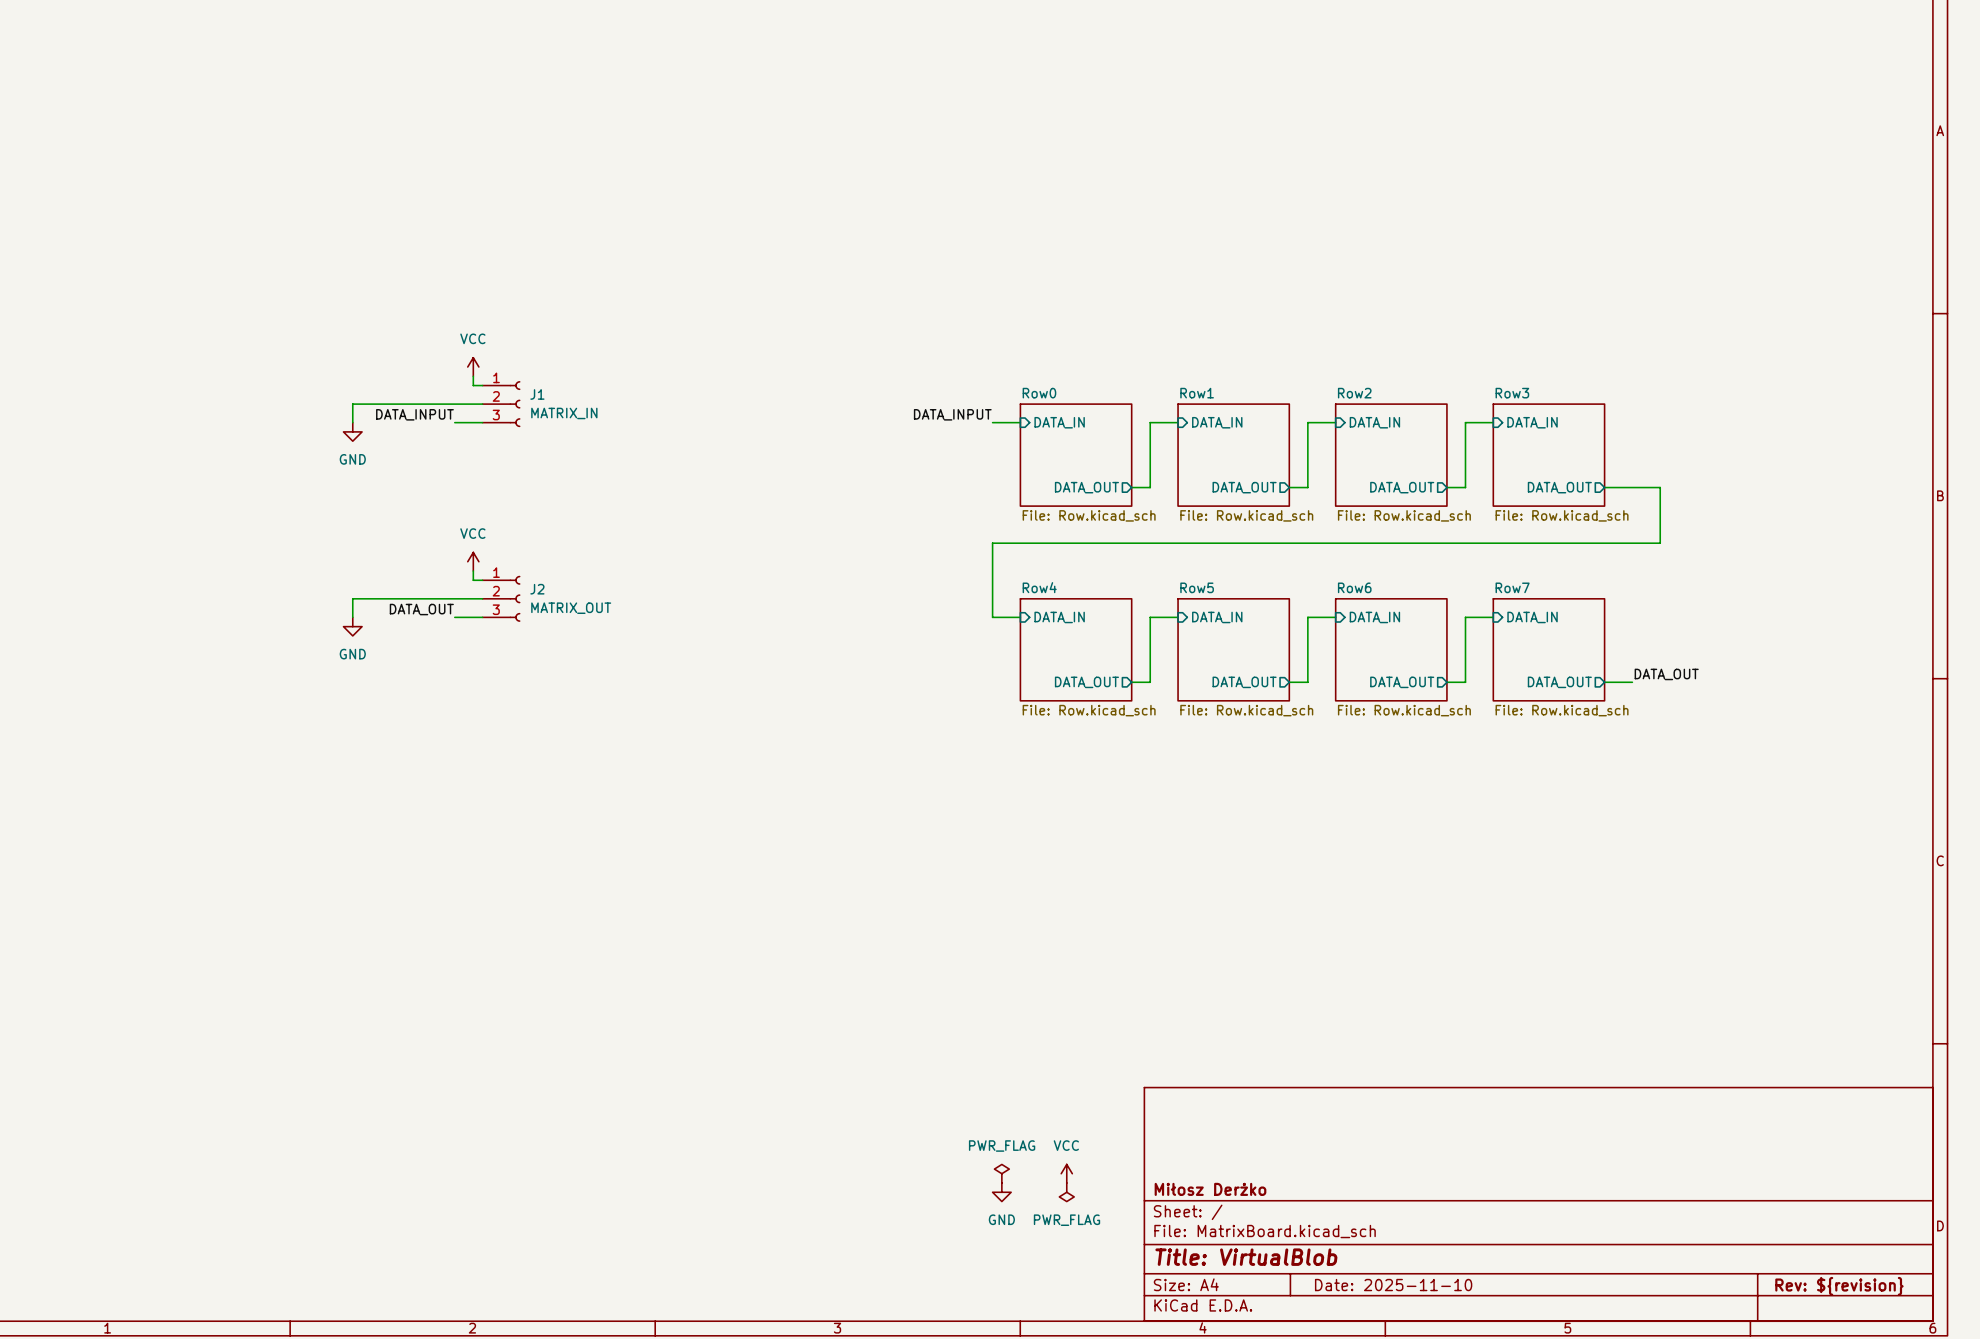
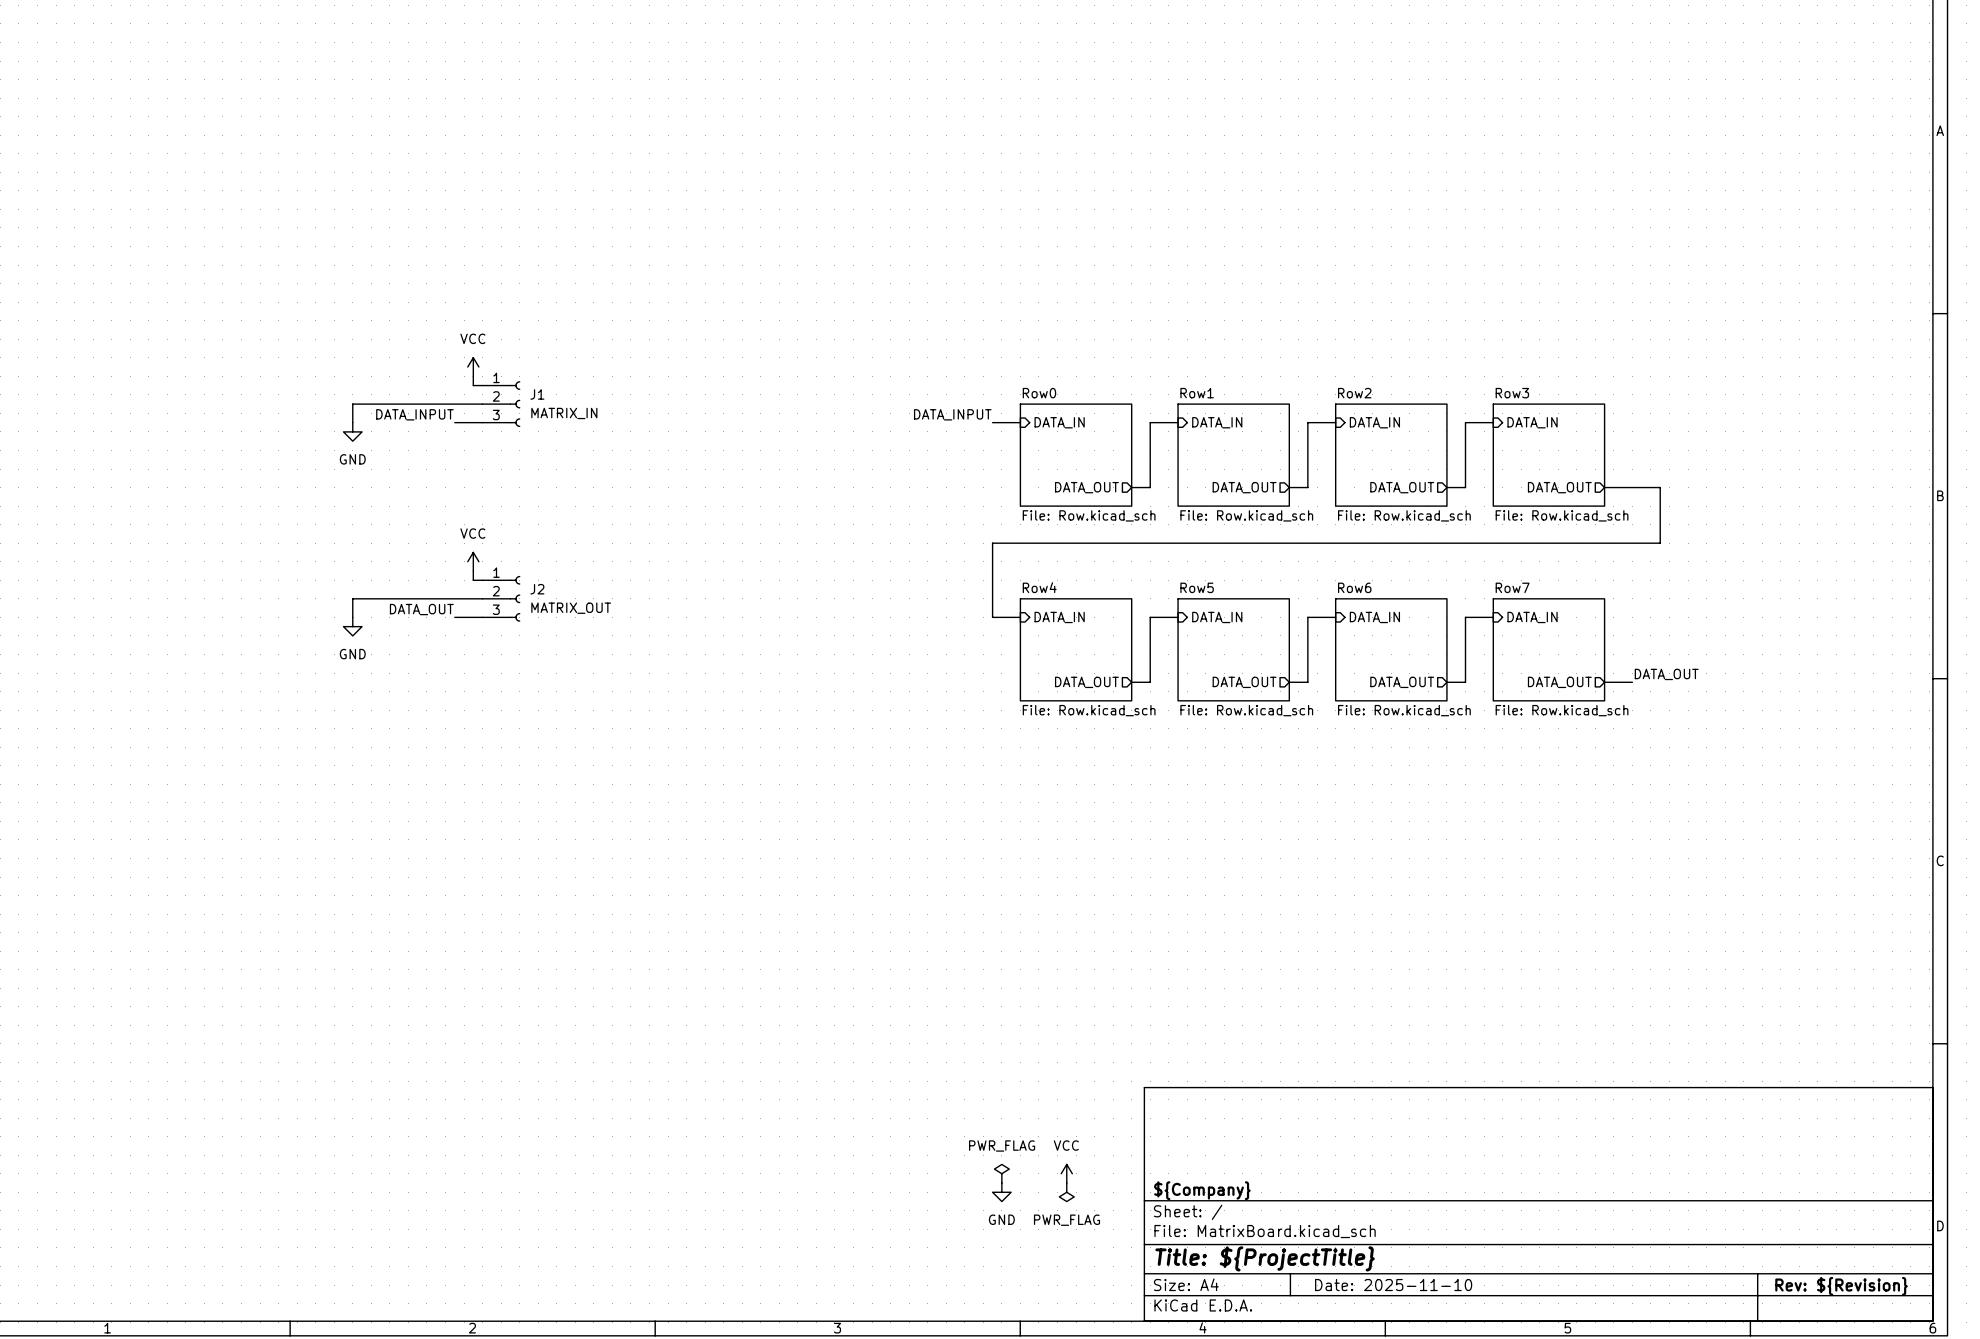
title block: Miłosz Derżko (1210, 1189) -> ${Company} (1202, 1190)
title block: Title: VirtualBlob (1246, 1257) -> Title: ${ProjectTitle} (1265, 1258)
title block: Rev: ${revision} (1839, 1286) -> Rev: ${Revision} (1841, 1286)

